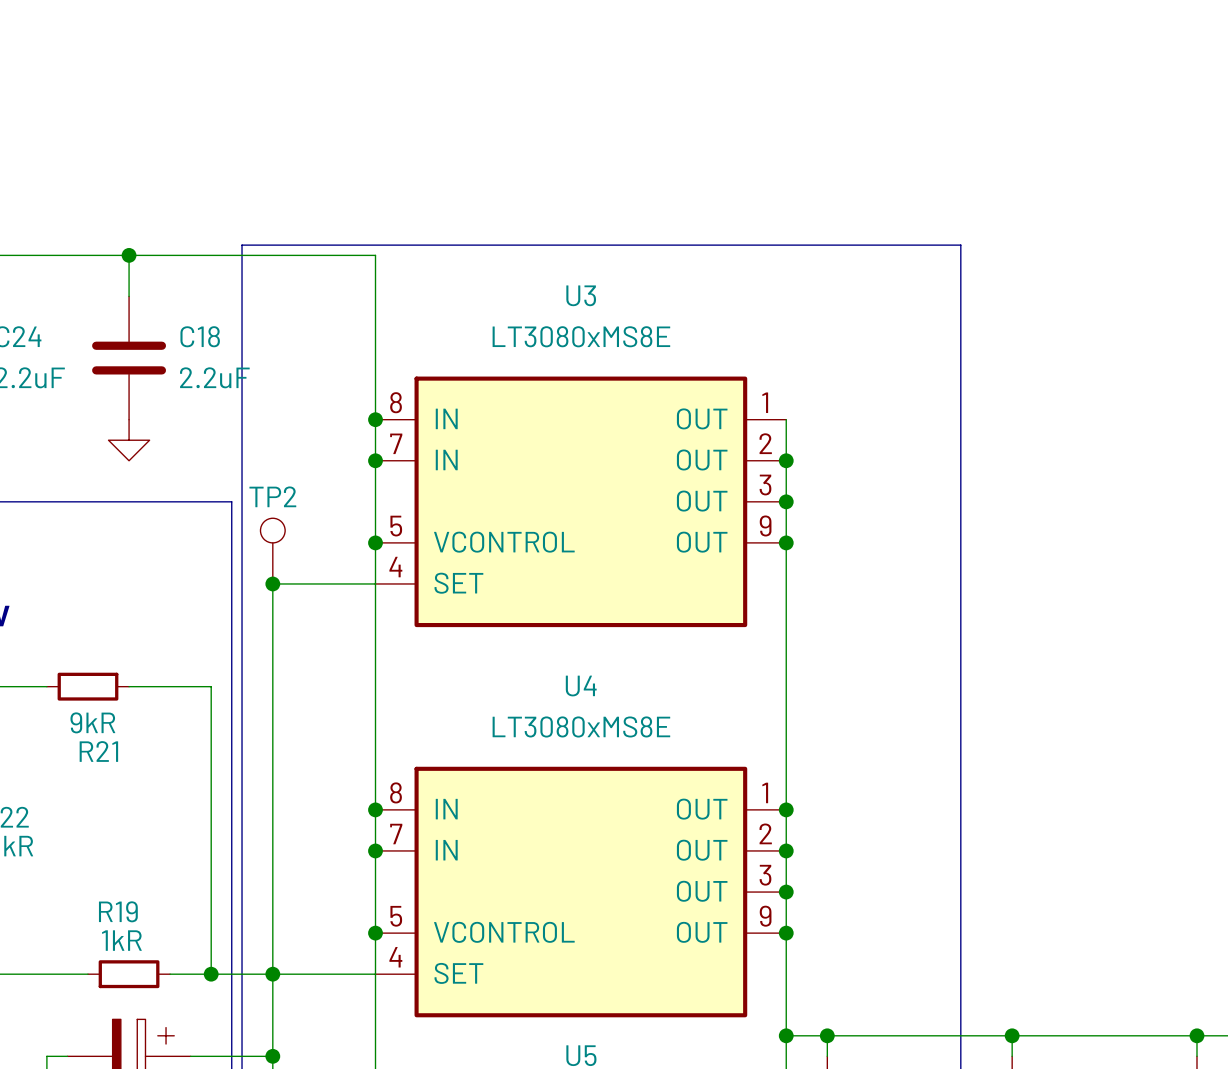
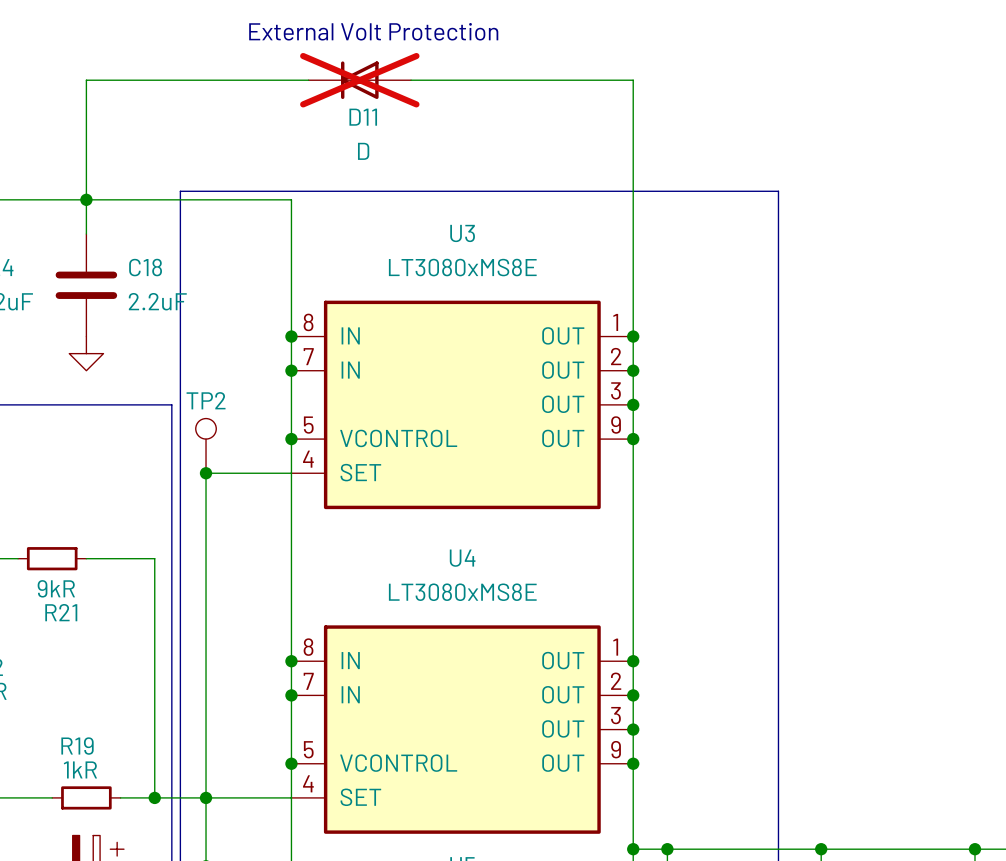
text: none -> External Volt Protection (373, 31)
wire: none -> (308, 80) (86, 80) (86, 199)
D11: none -> D (359, 80)
wire: none -> (411, 80) (633, 80) (633, 336)
junction: none -> (633, 336)

